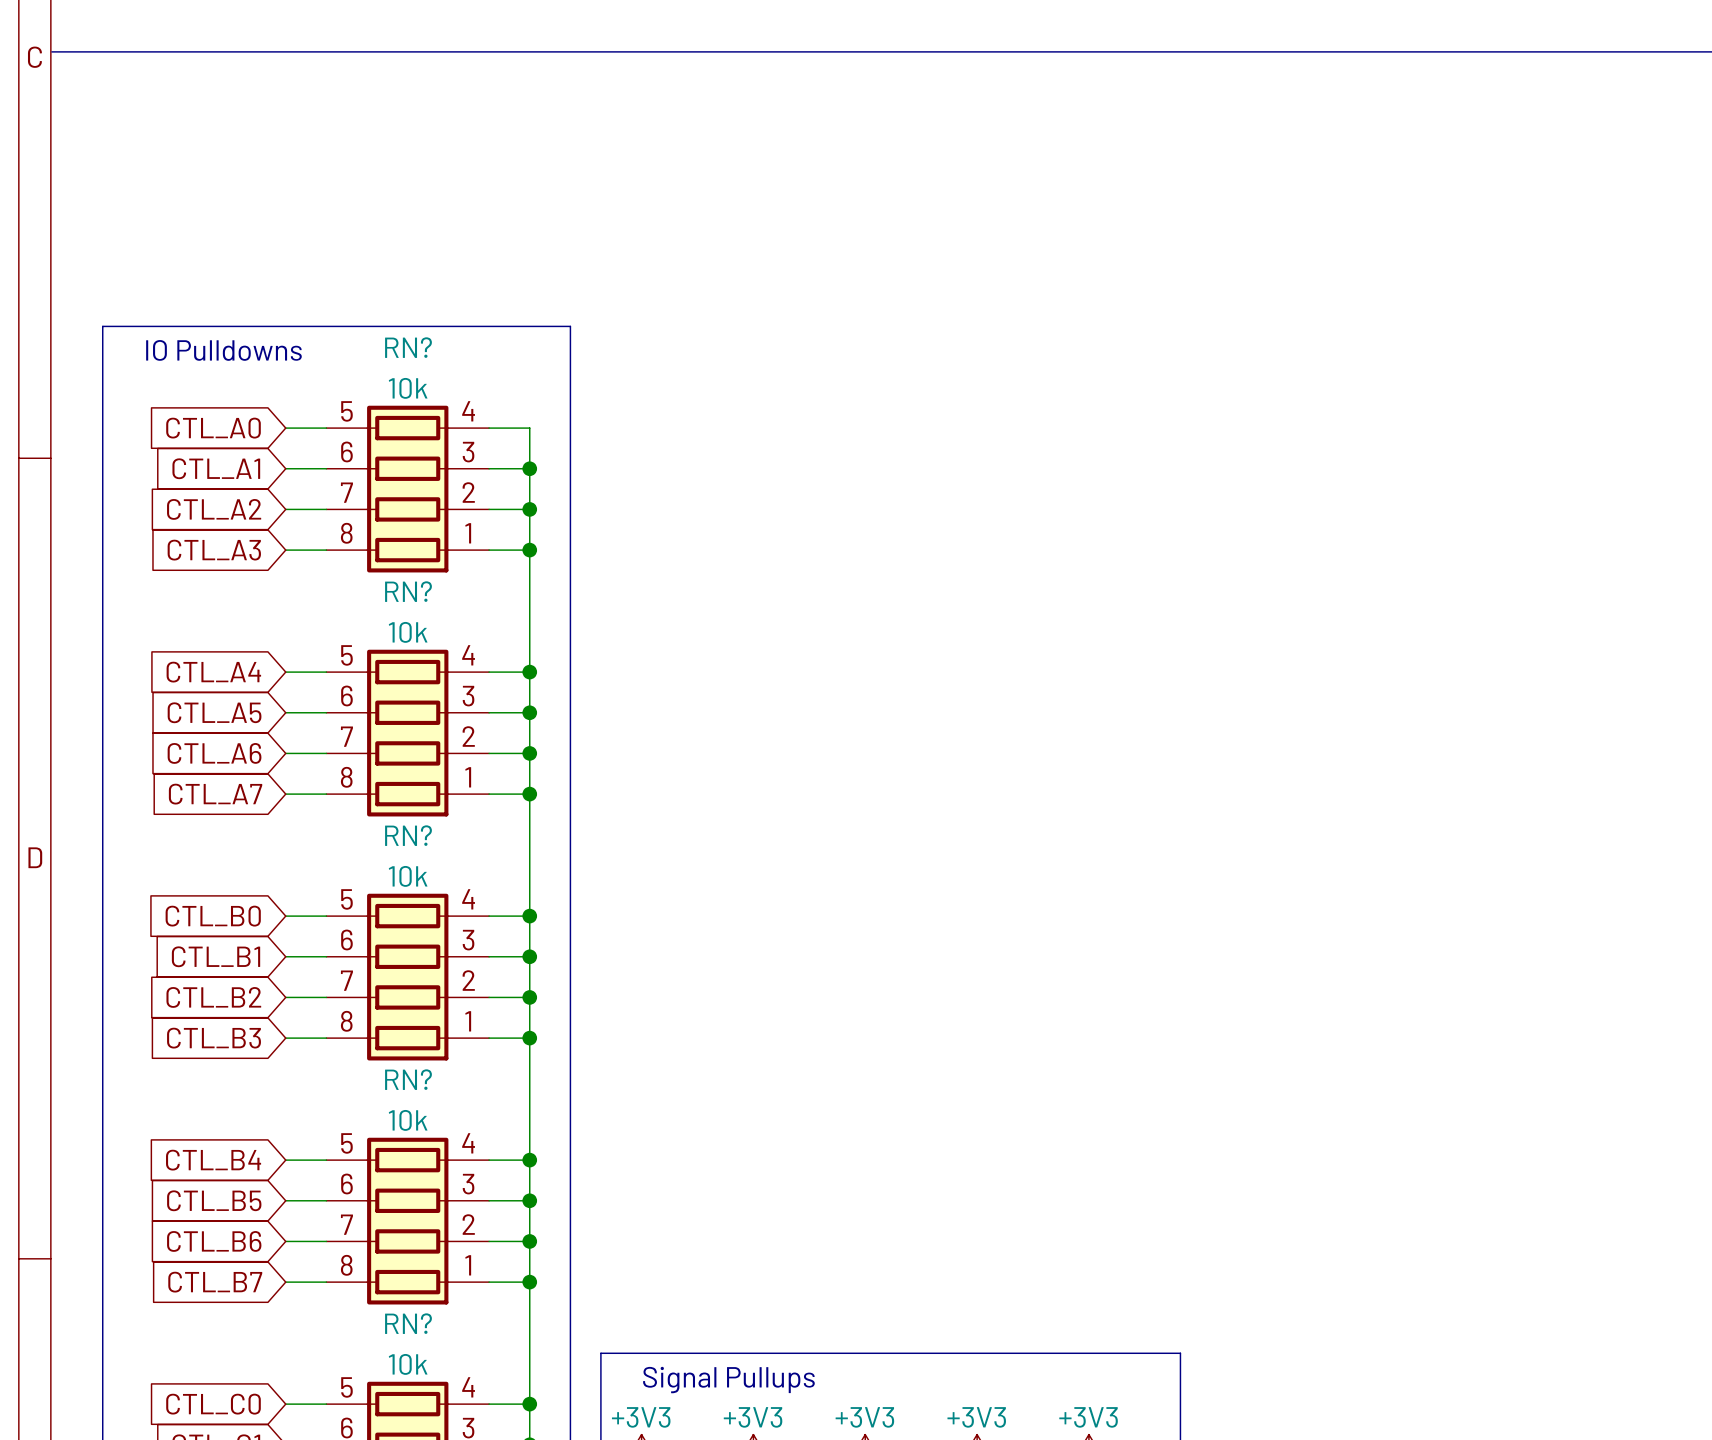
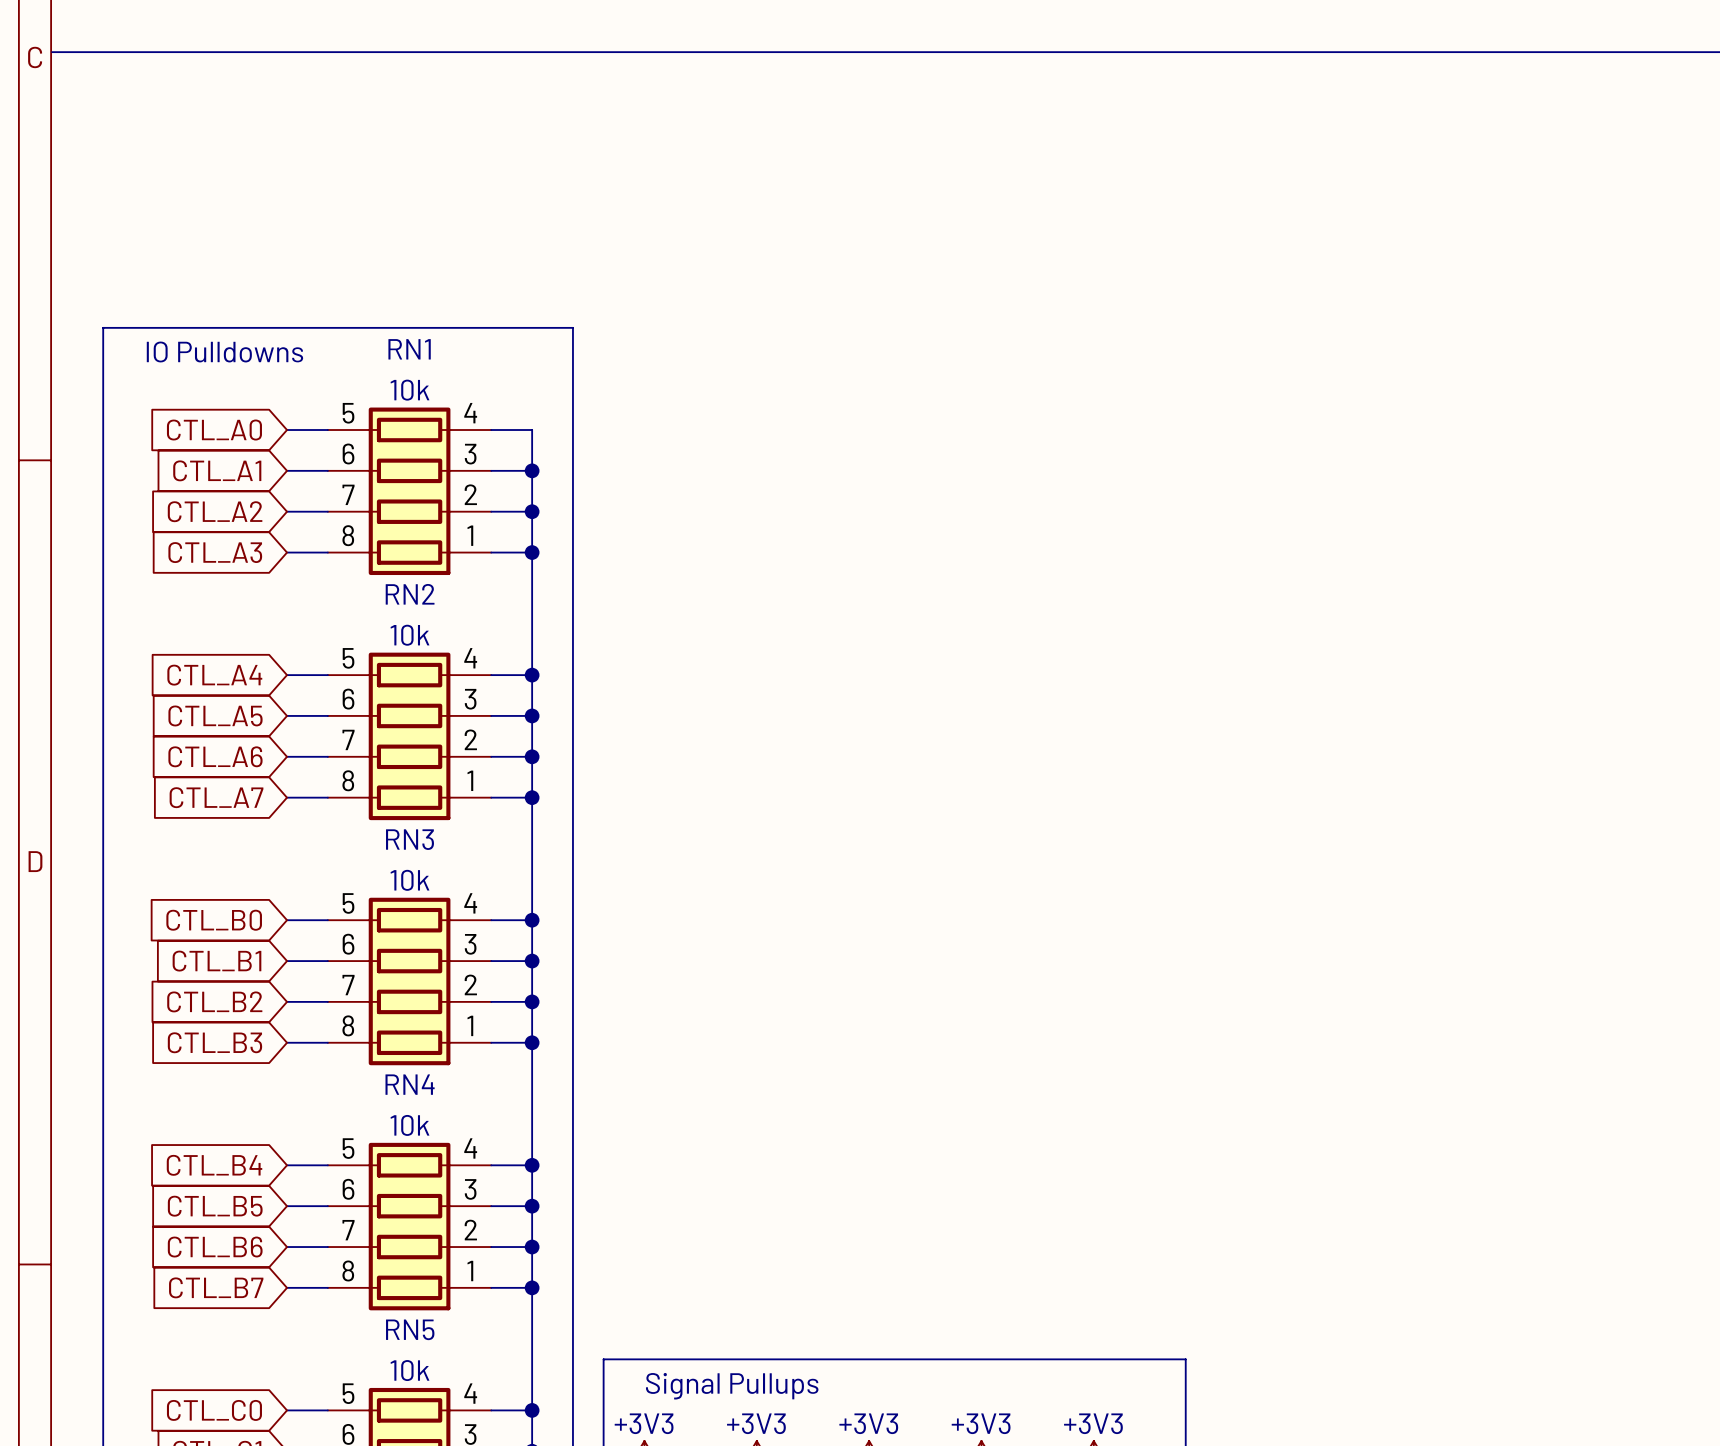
RN? name: RN? (408, 347) -> RN1 (409, 349)
RN? name: RN? (408, 591) -> RN2 (410, 594)
RN? name: RN? (408, 835) -> RN3 (410, 839)
RN? name: RN? (408, 1079) -> RN4 (410, 1084)
RN? name: RN? (408, 1323) -> RN5 (410, 1329)

